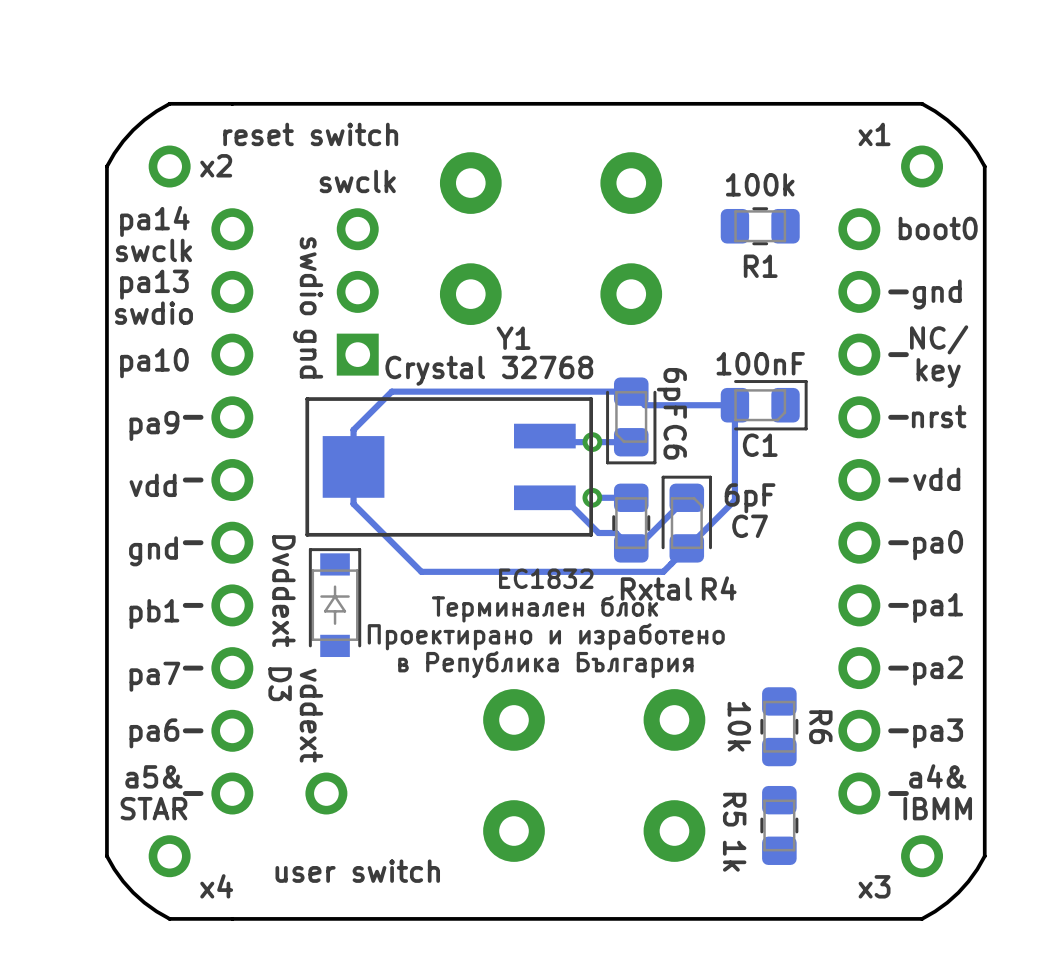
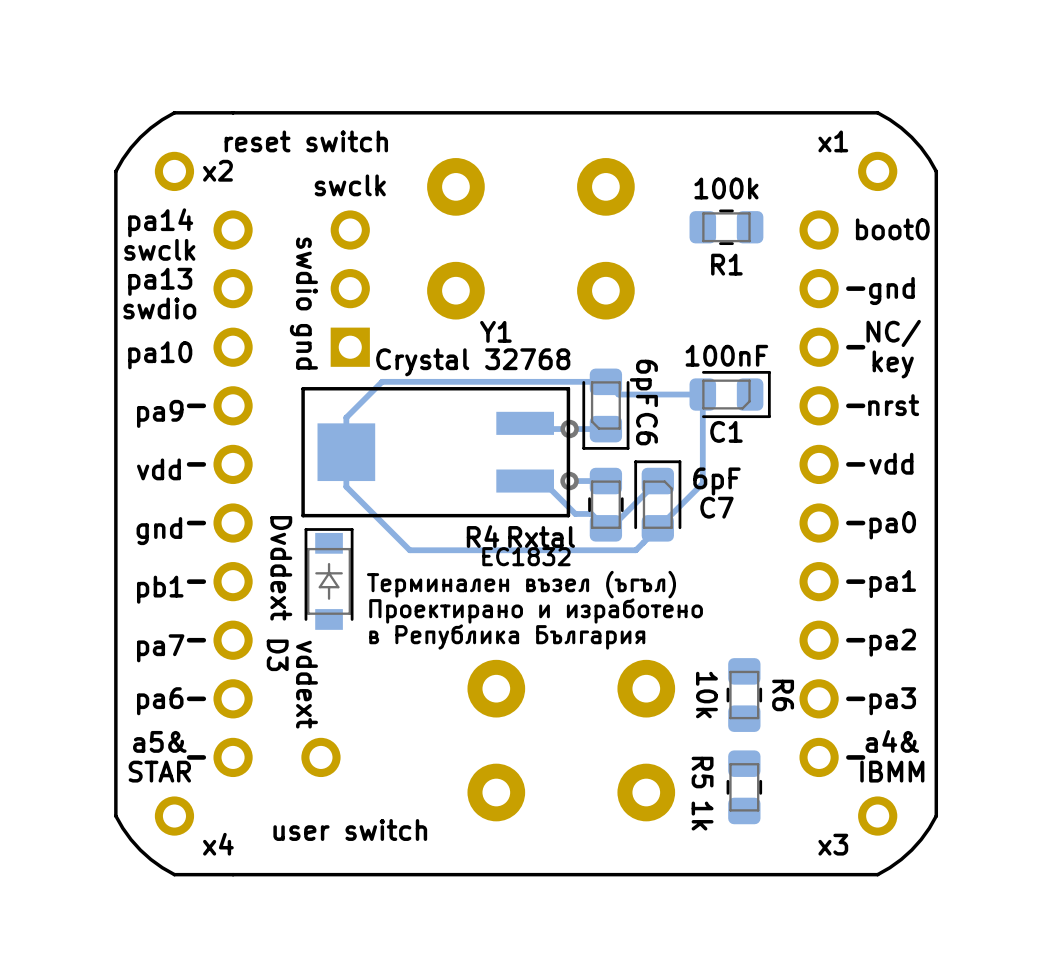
R4 name position: R4 (719, 588) -> R4 (483, 536)
R4 value position: Rxtal (656, 589) -> Rxtal (541, 536)
text: Терминален блок (545, 609) -> Терминален възел (ъгъл) (521, 584)
text position: Проектирано и изработено (546, 636) -> Проектирано и изработено (536, 610)
text position: в Република България (545, 664) -> в Република България (507, 636)

